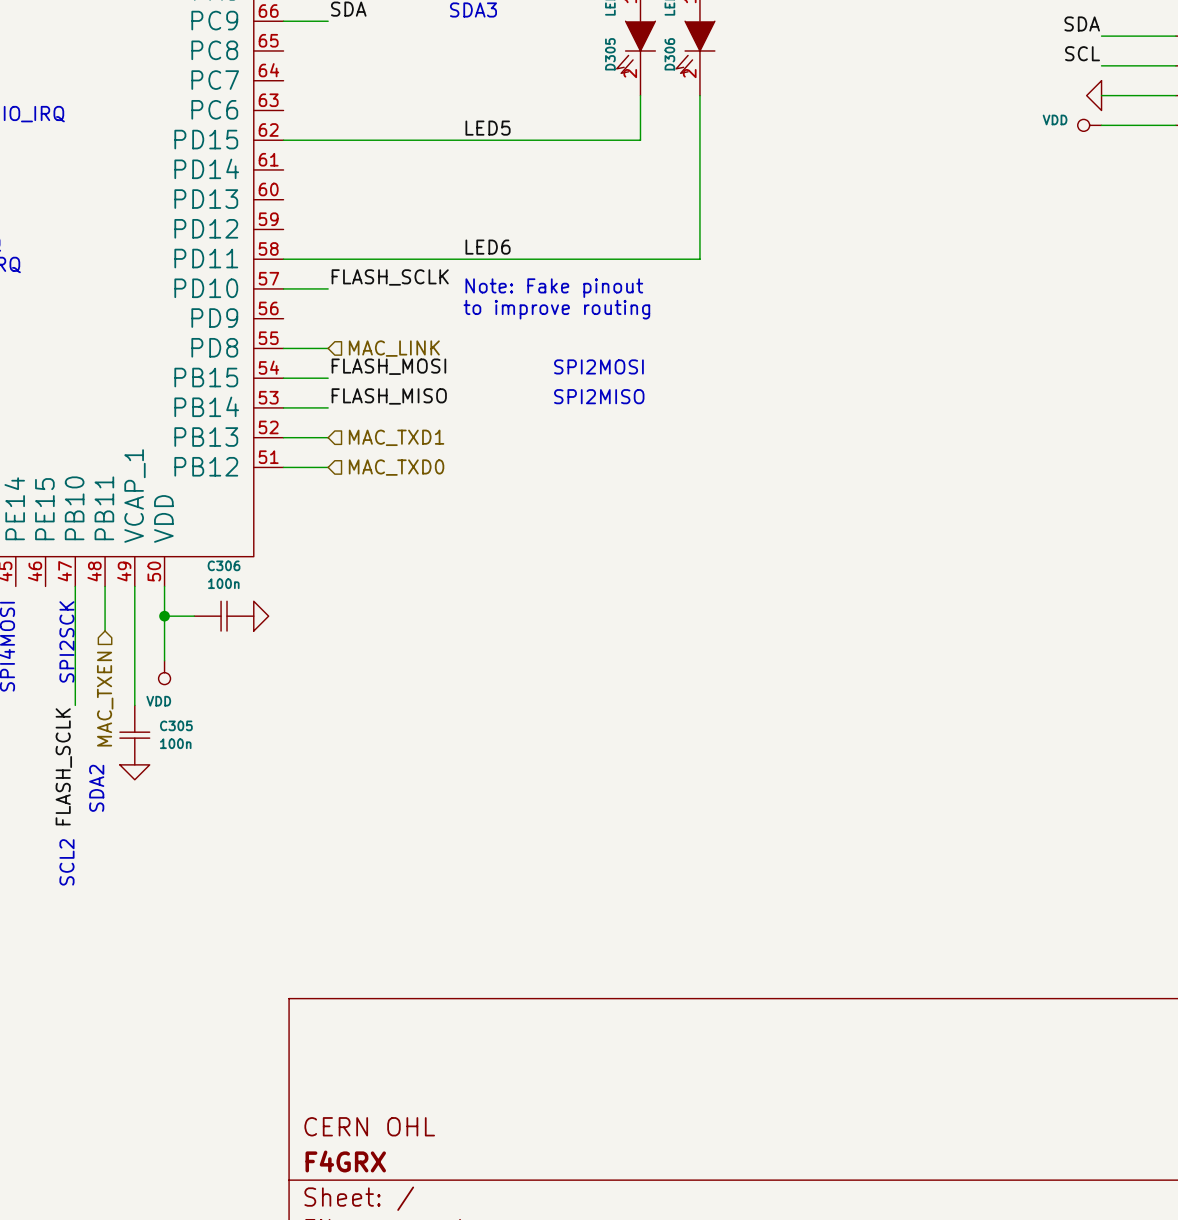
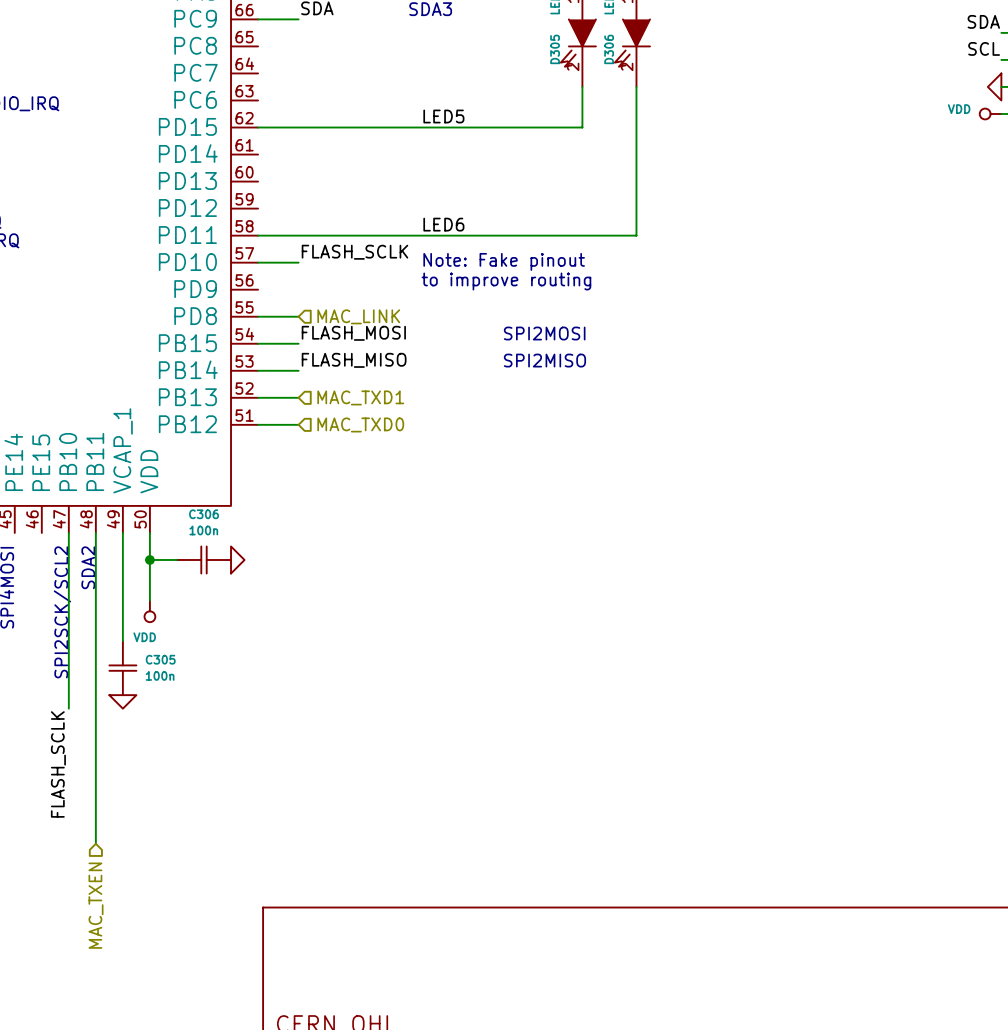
wire: none -> (95, 573) (95, 843)
text: SPI2SCK (66, 641) -> SPI2SCK/SCL2 (62, 612)
hierarchical label: MAC_TXEN (105, 699) -> none
wire: none -> (68, 641) (68, 708)
label position: FLASH_SCLK (63, 766) -> FLASH_SCLK (58, 764)
text position: SDA2 (96, 788) -> SDA2 (88, 567)
text: SCL2 (66, 862) -> none
hierarchical label: none -> MAC_TXEN (96, 905)

